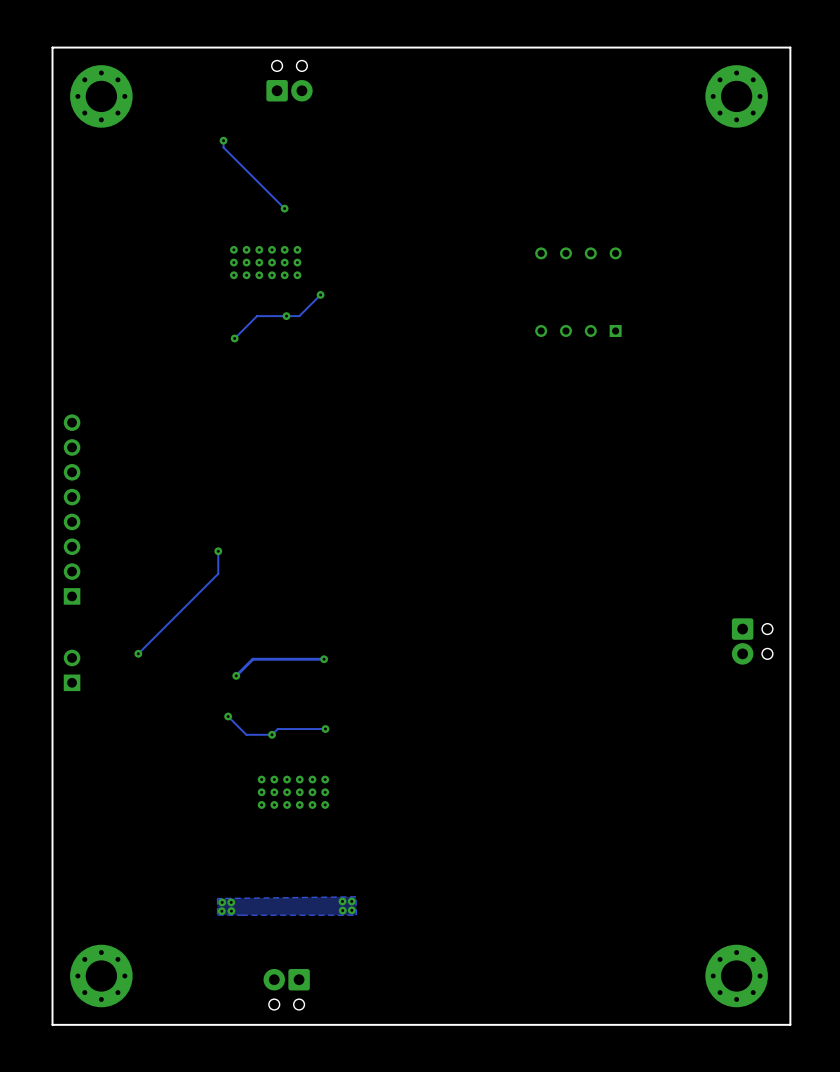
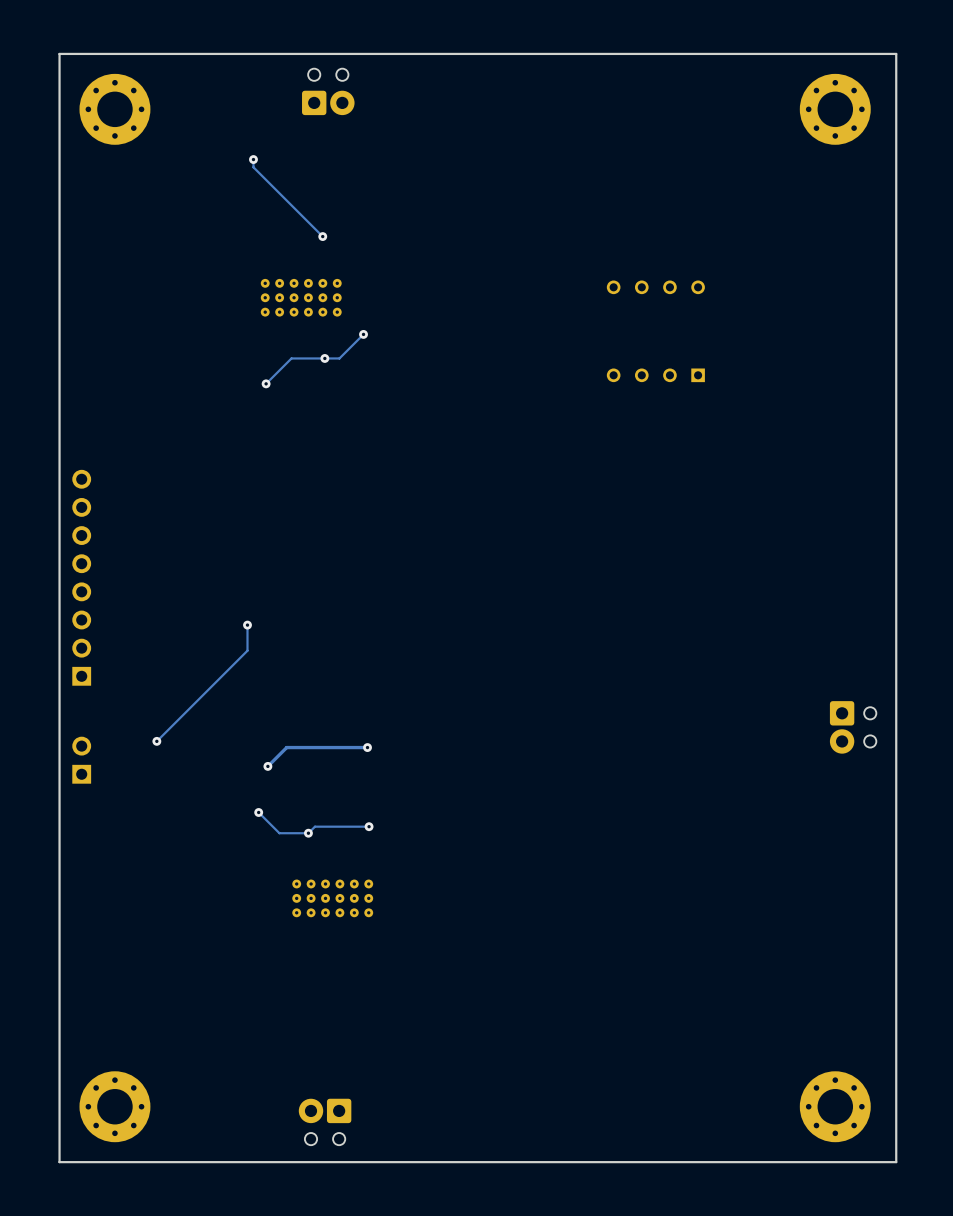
zone outline: (355, 896) (356, 915) (217, 915) (217, 898) (355, 896) -> none
via: (342, 901) -> none
via: (351, 901) -> none
via: (222, 902) -> none
via: (231, 902) -> none
via: (342, 910) -> none
via: (351, 910) -> none
via: (221, 911) -> none
via: (231, 911) -> none

